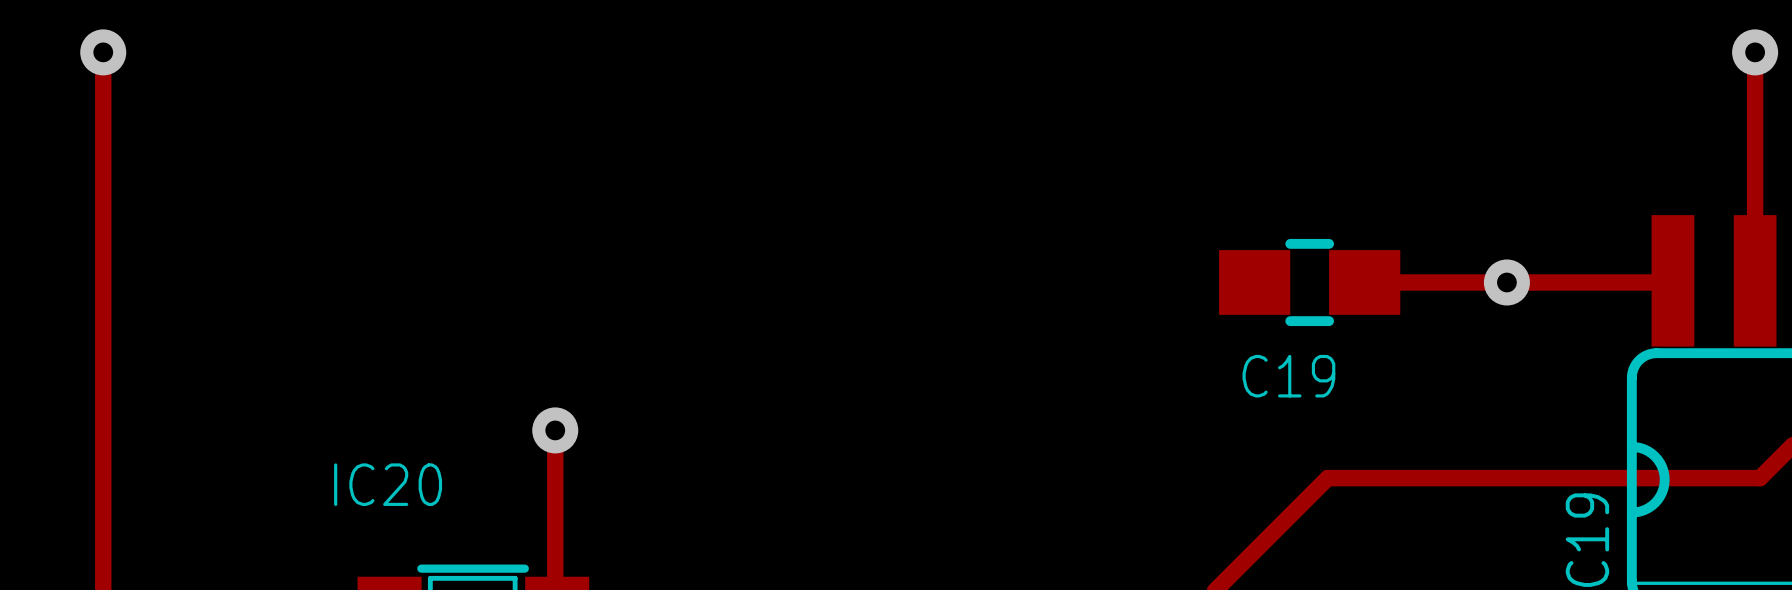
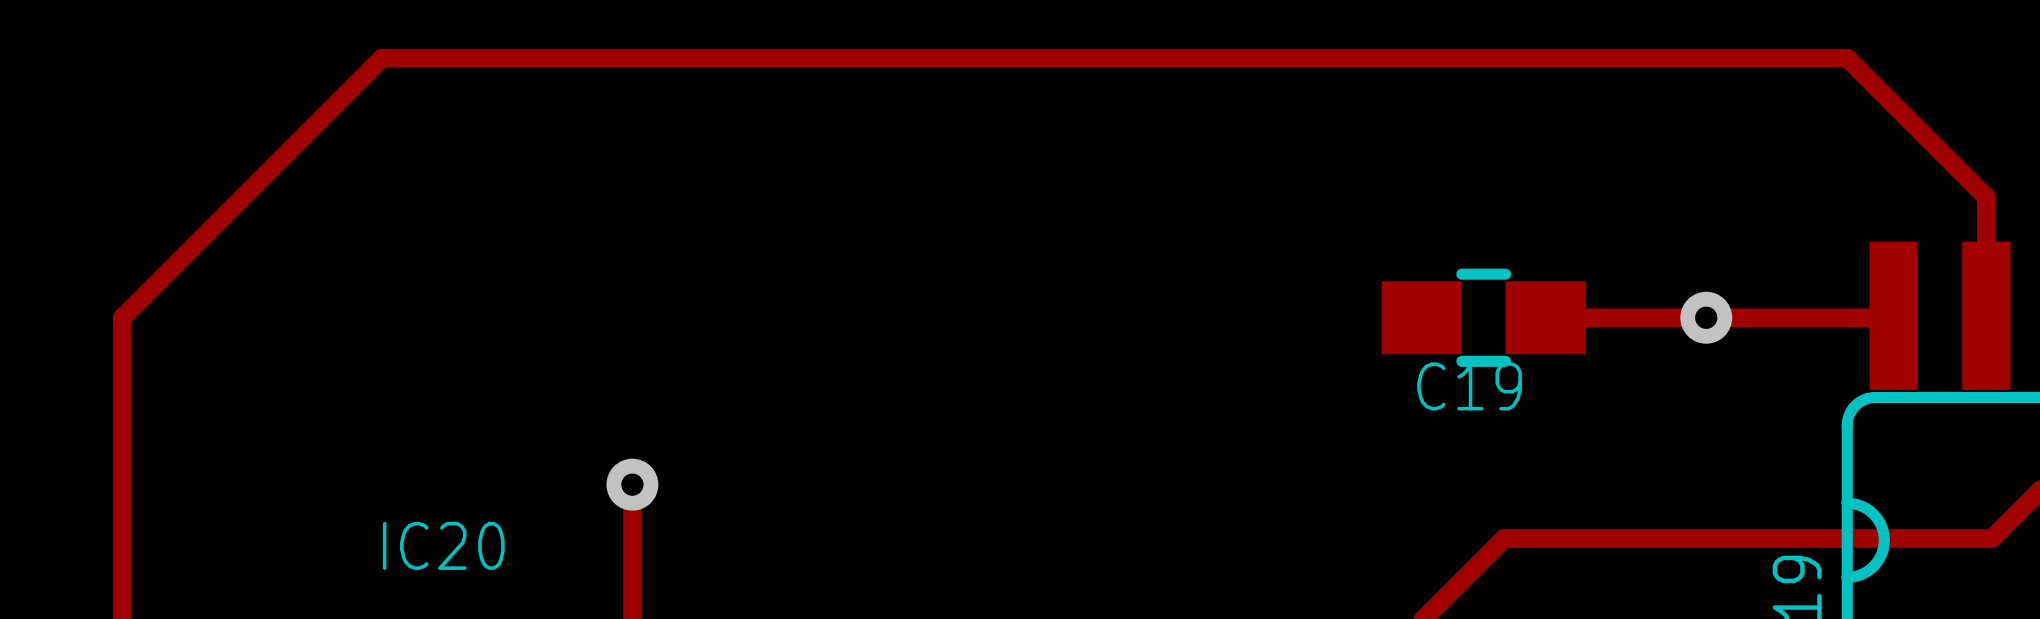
track: (103, 52) (103, 282) -> (1986, 197) (1847, 58) (382, 58) (122, 317)
via: (103, 52) -> none
track: (1755, 52) (1755, 175) -> none
via: (1755, 52) -> none
C19 name position: C19 (1288, 376) -> C19 (1469, 386)

